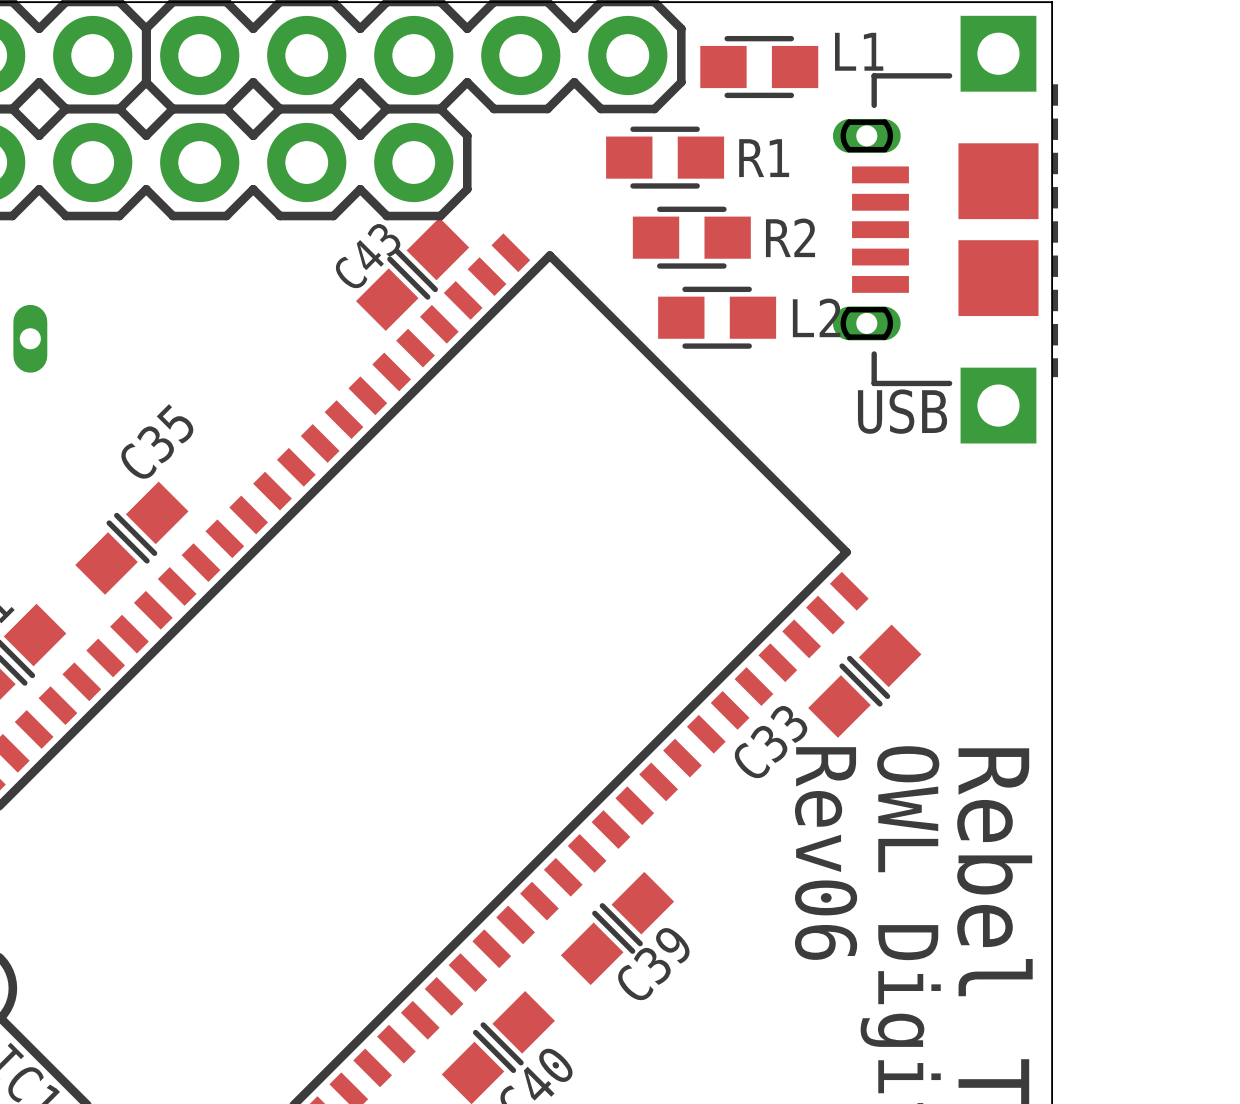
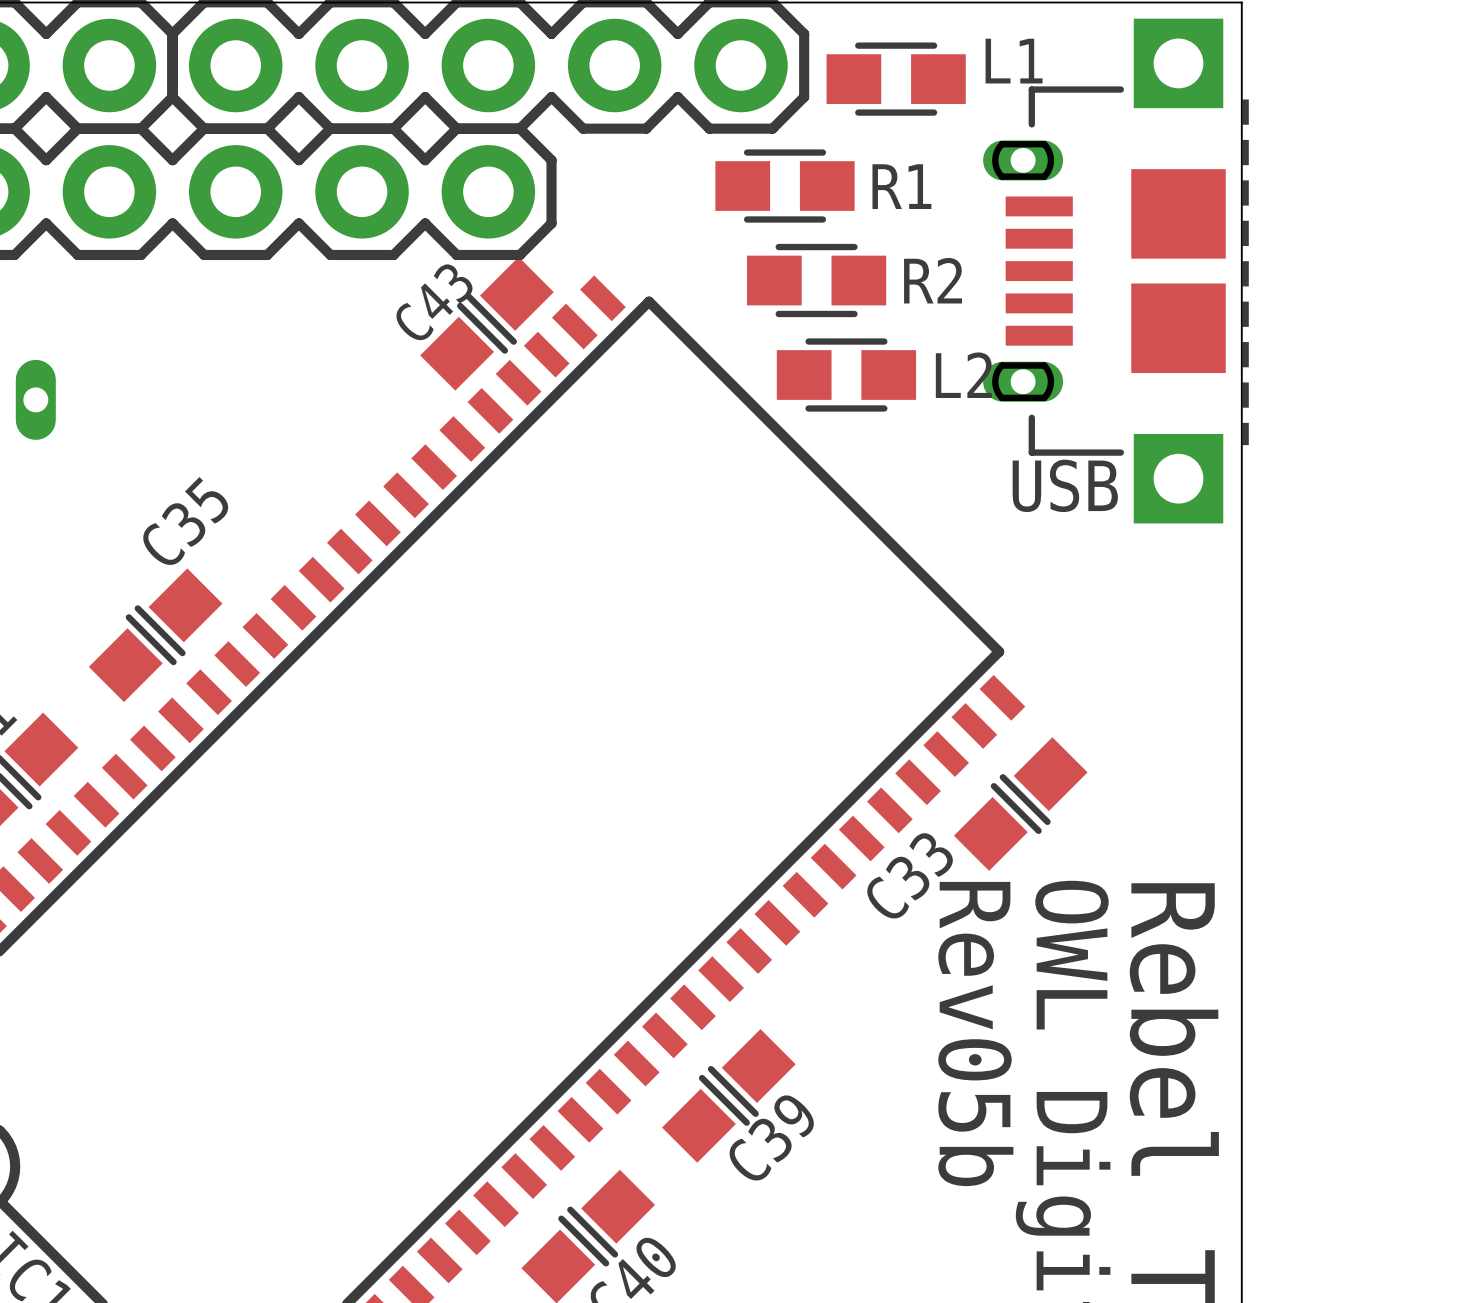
text: Rev06 (826, 853) -> Rev05b (975, 1033)

